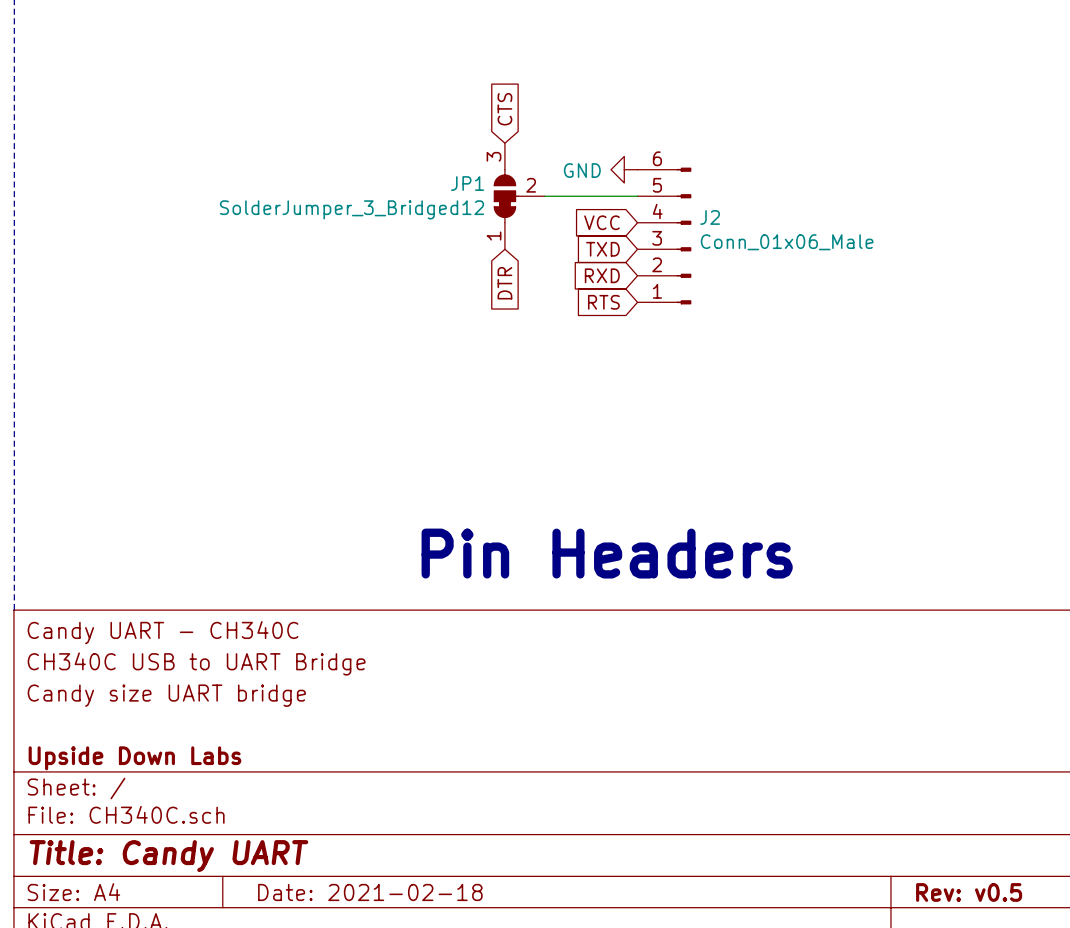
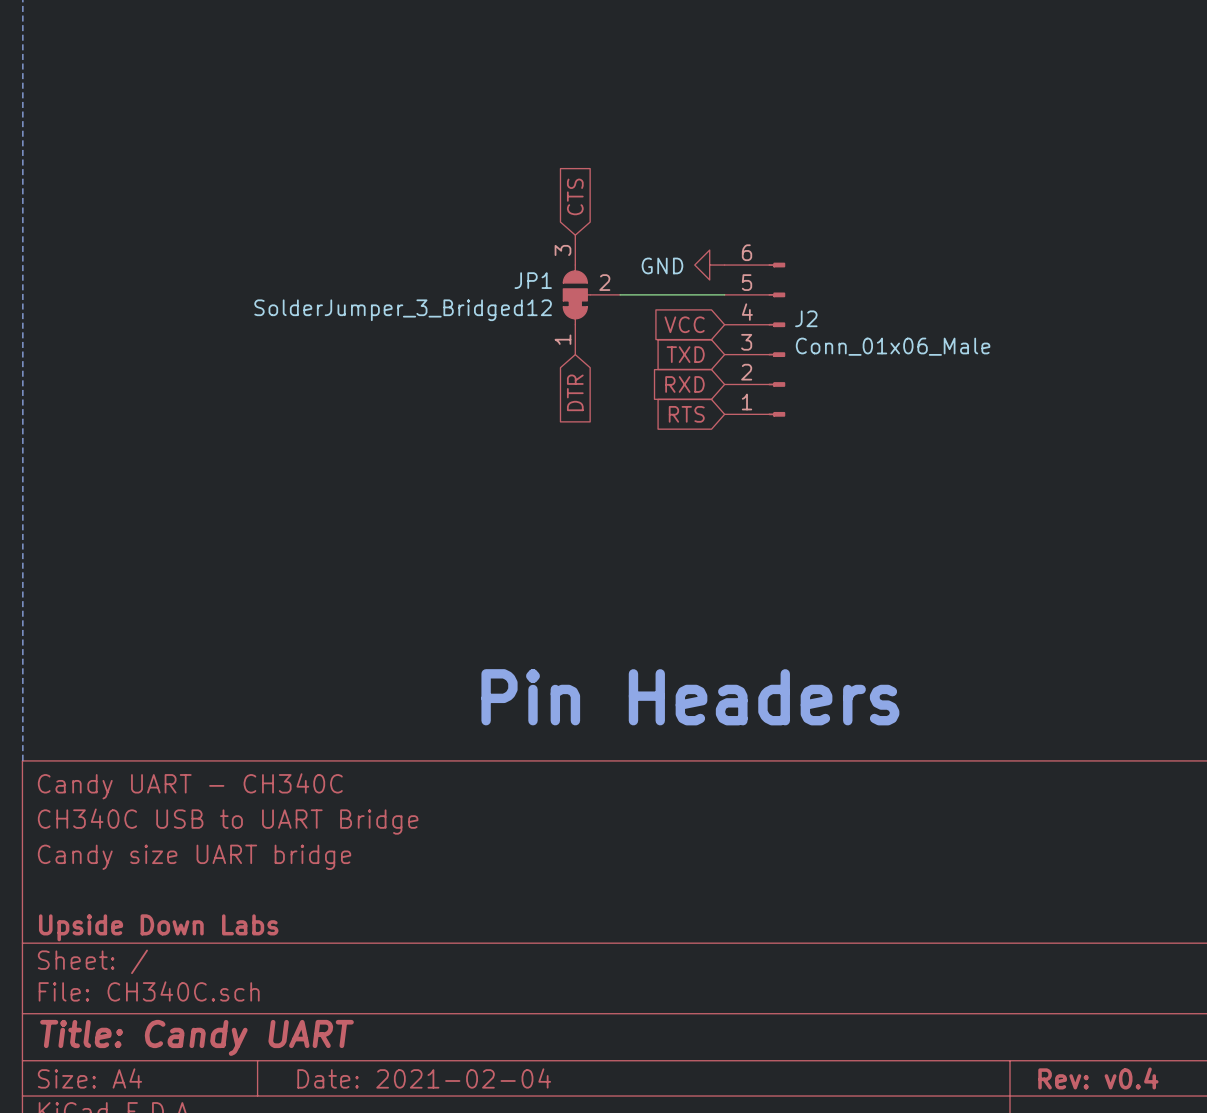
title block: Date: 2021-02-18 (370, 892) -> Date: 2021-02-04 (424, 1078)
title block: Rev: v0.5 (969, 892) -> Rev: v0.4 (1098, 1078)

